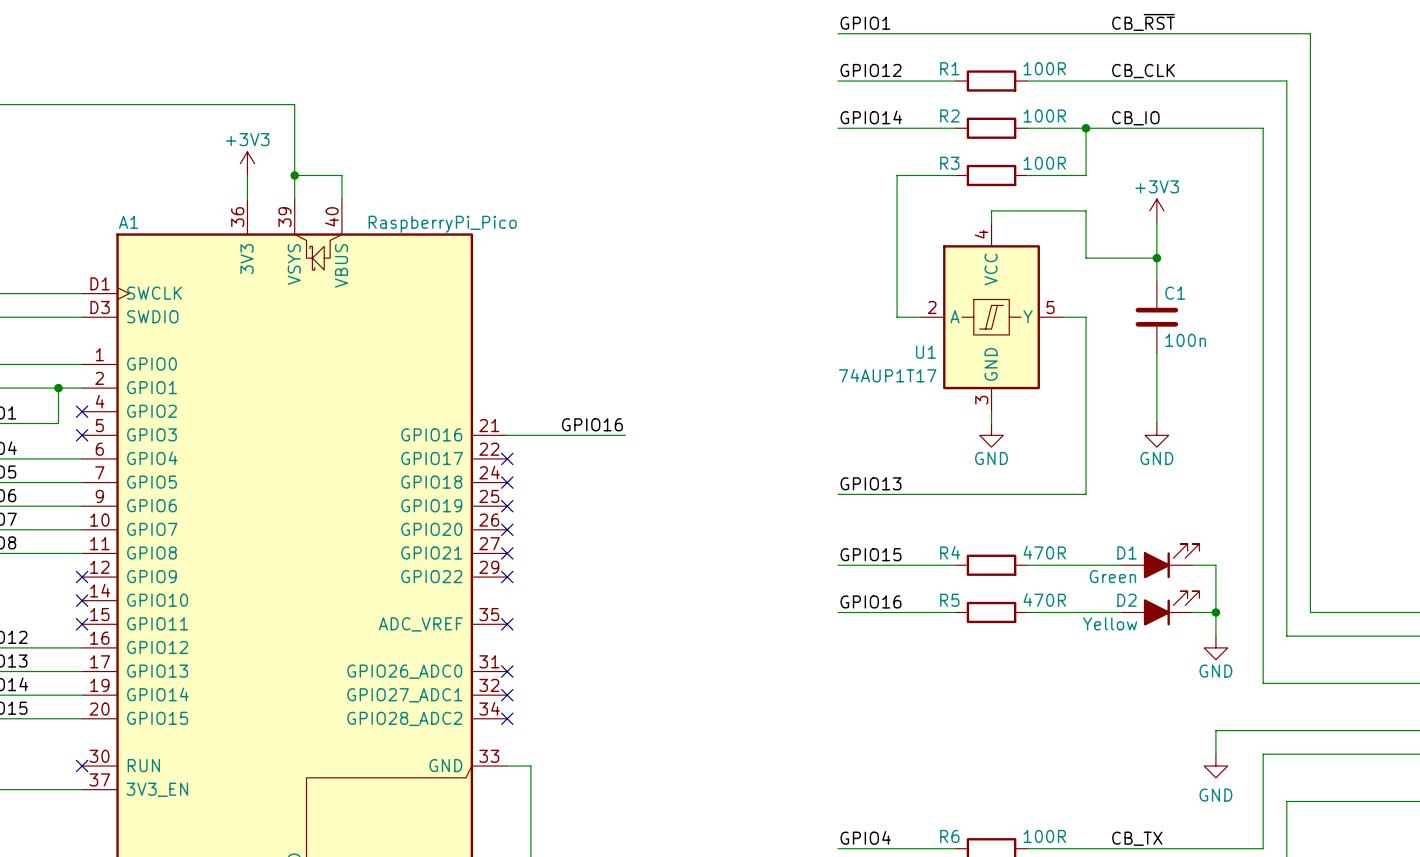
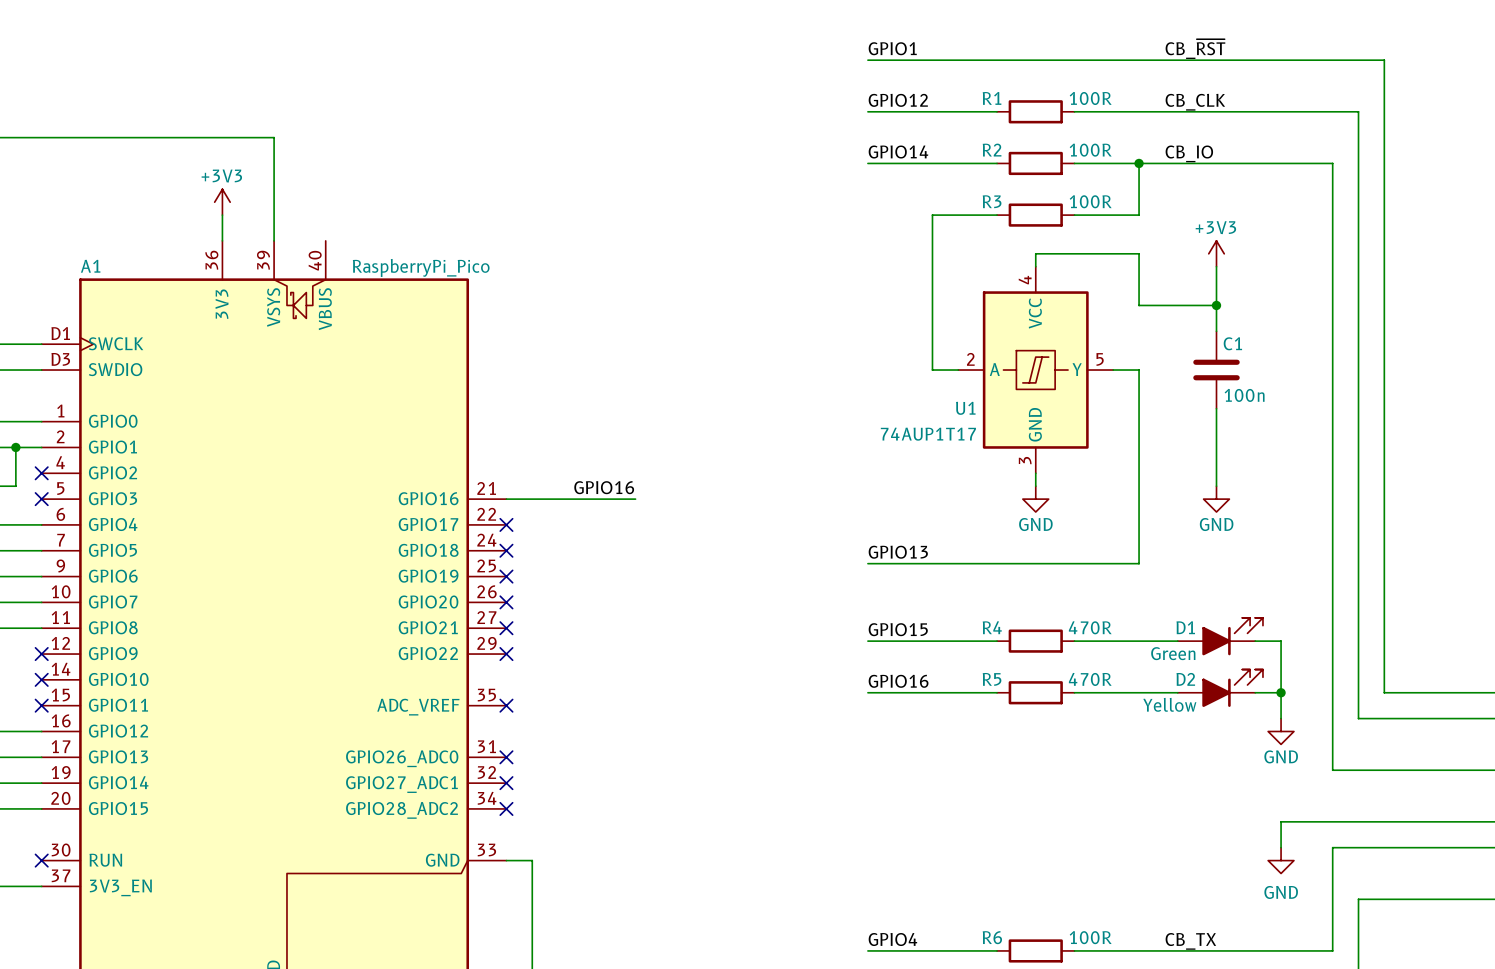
wire: (294, 175) (341, 175) (341, 199) -> none
junction: (294, 175) -> none

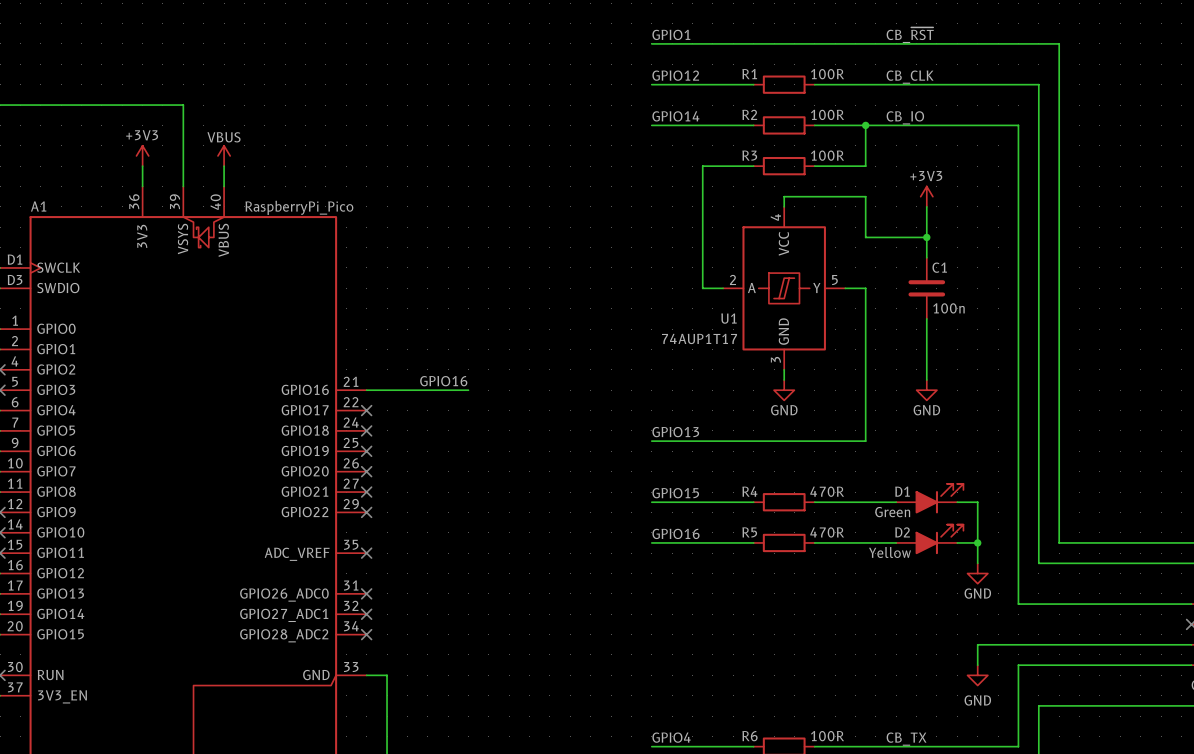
power symbol: none -> VBUS (224, 155)
wire: none -> (224, 166) (224, 186)

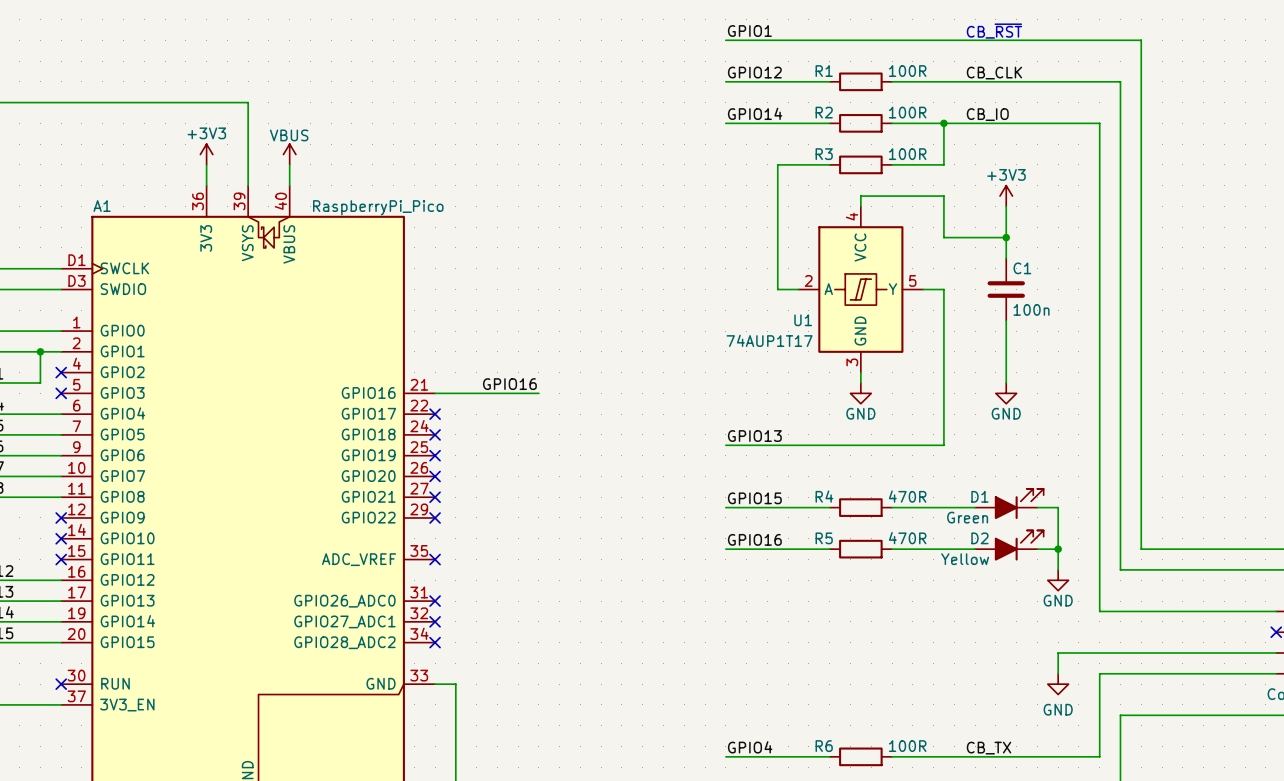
label: CB_~{RST} (910, 35) -> none
text: none -> CB_~{RST} (994, 31)

